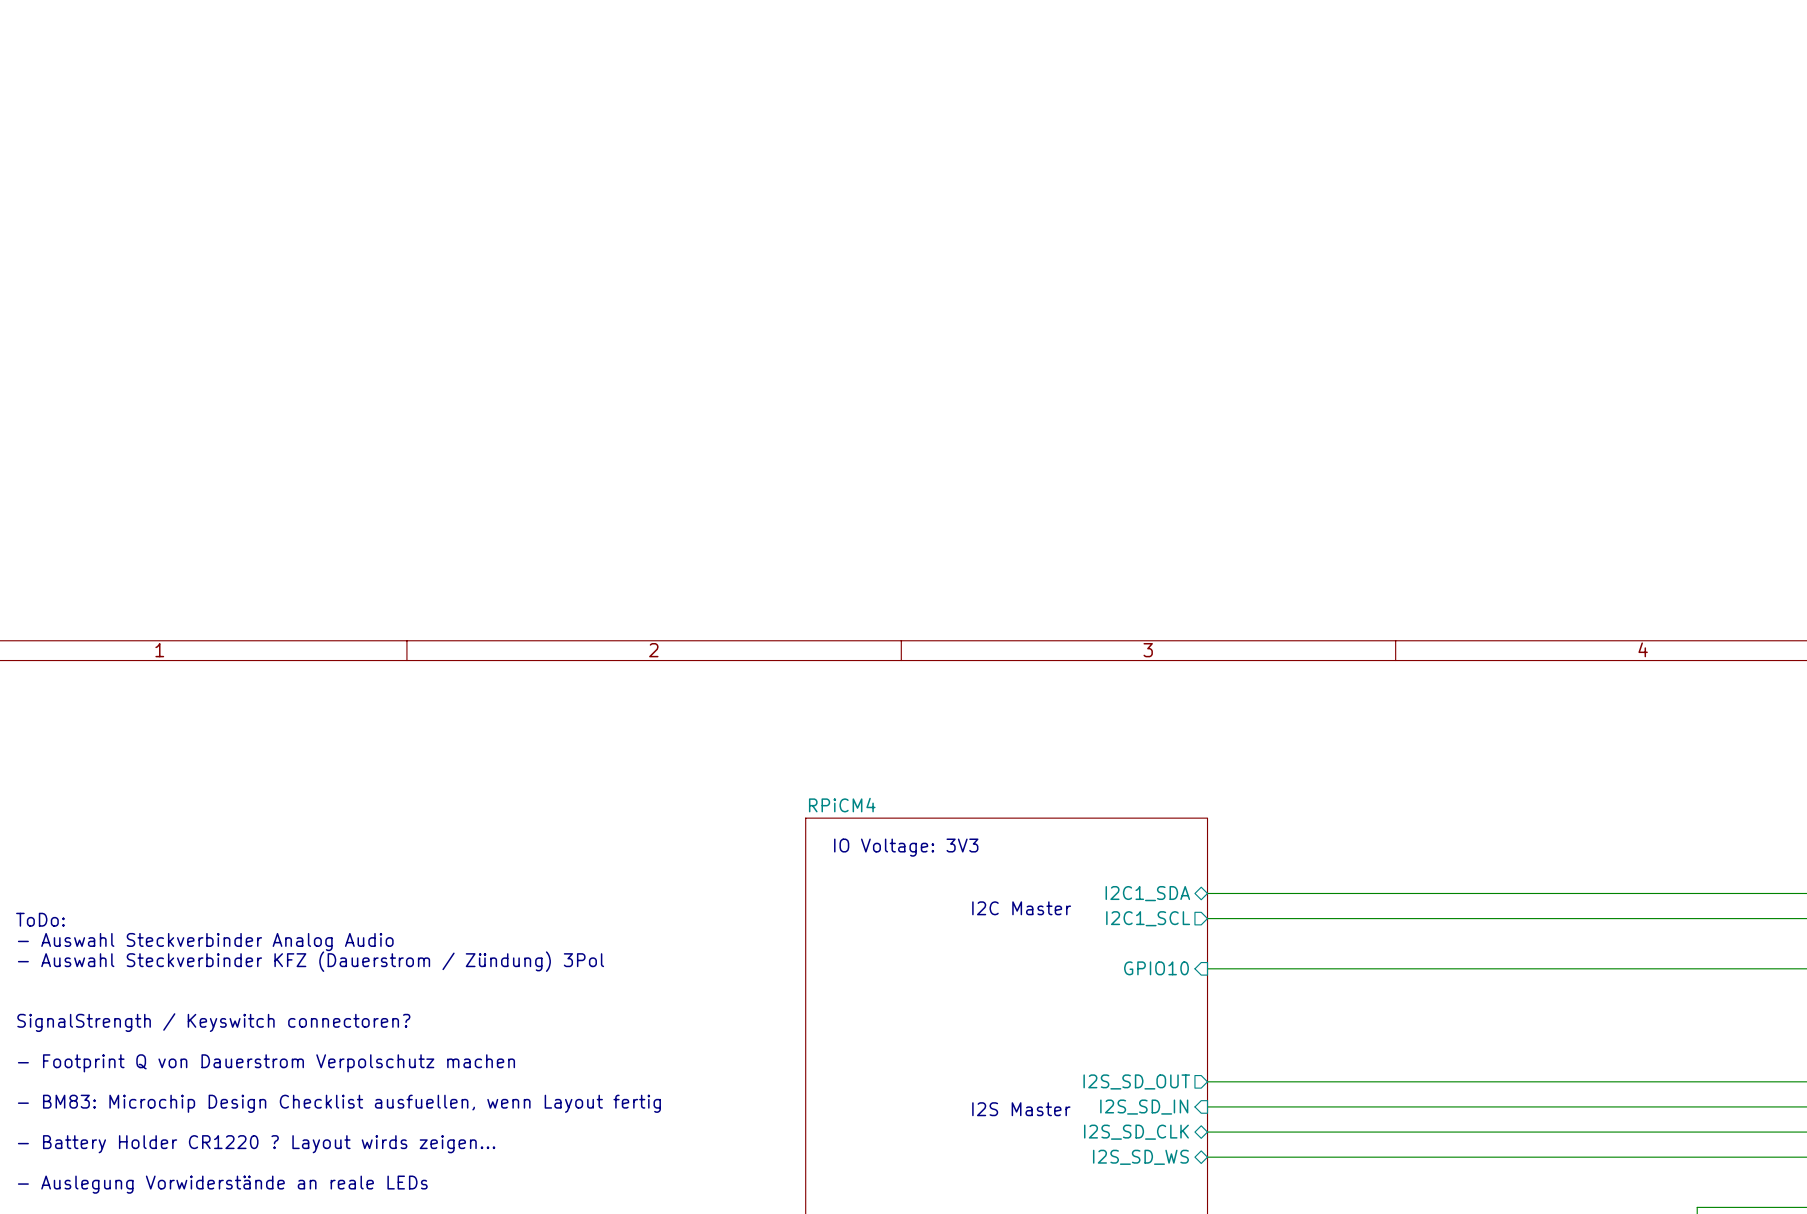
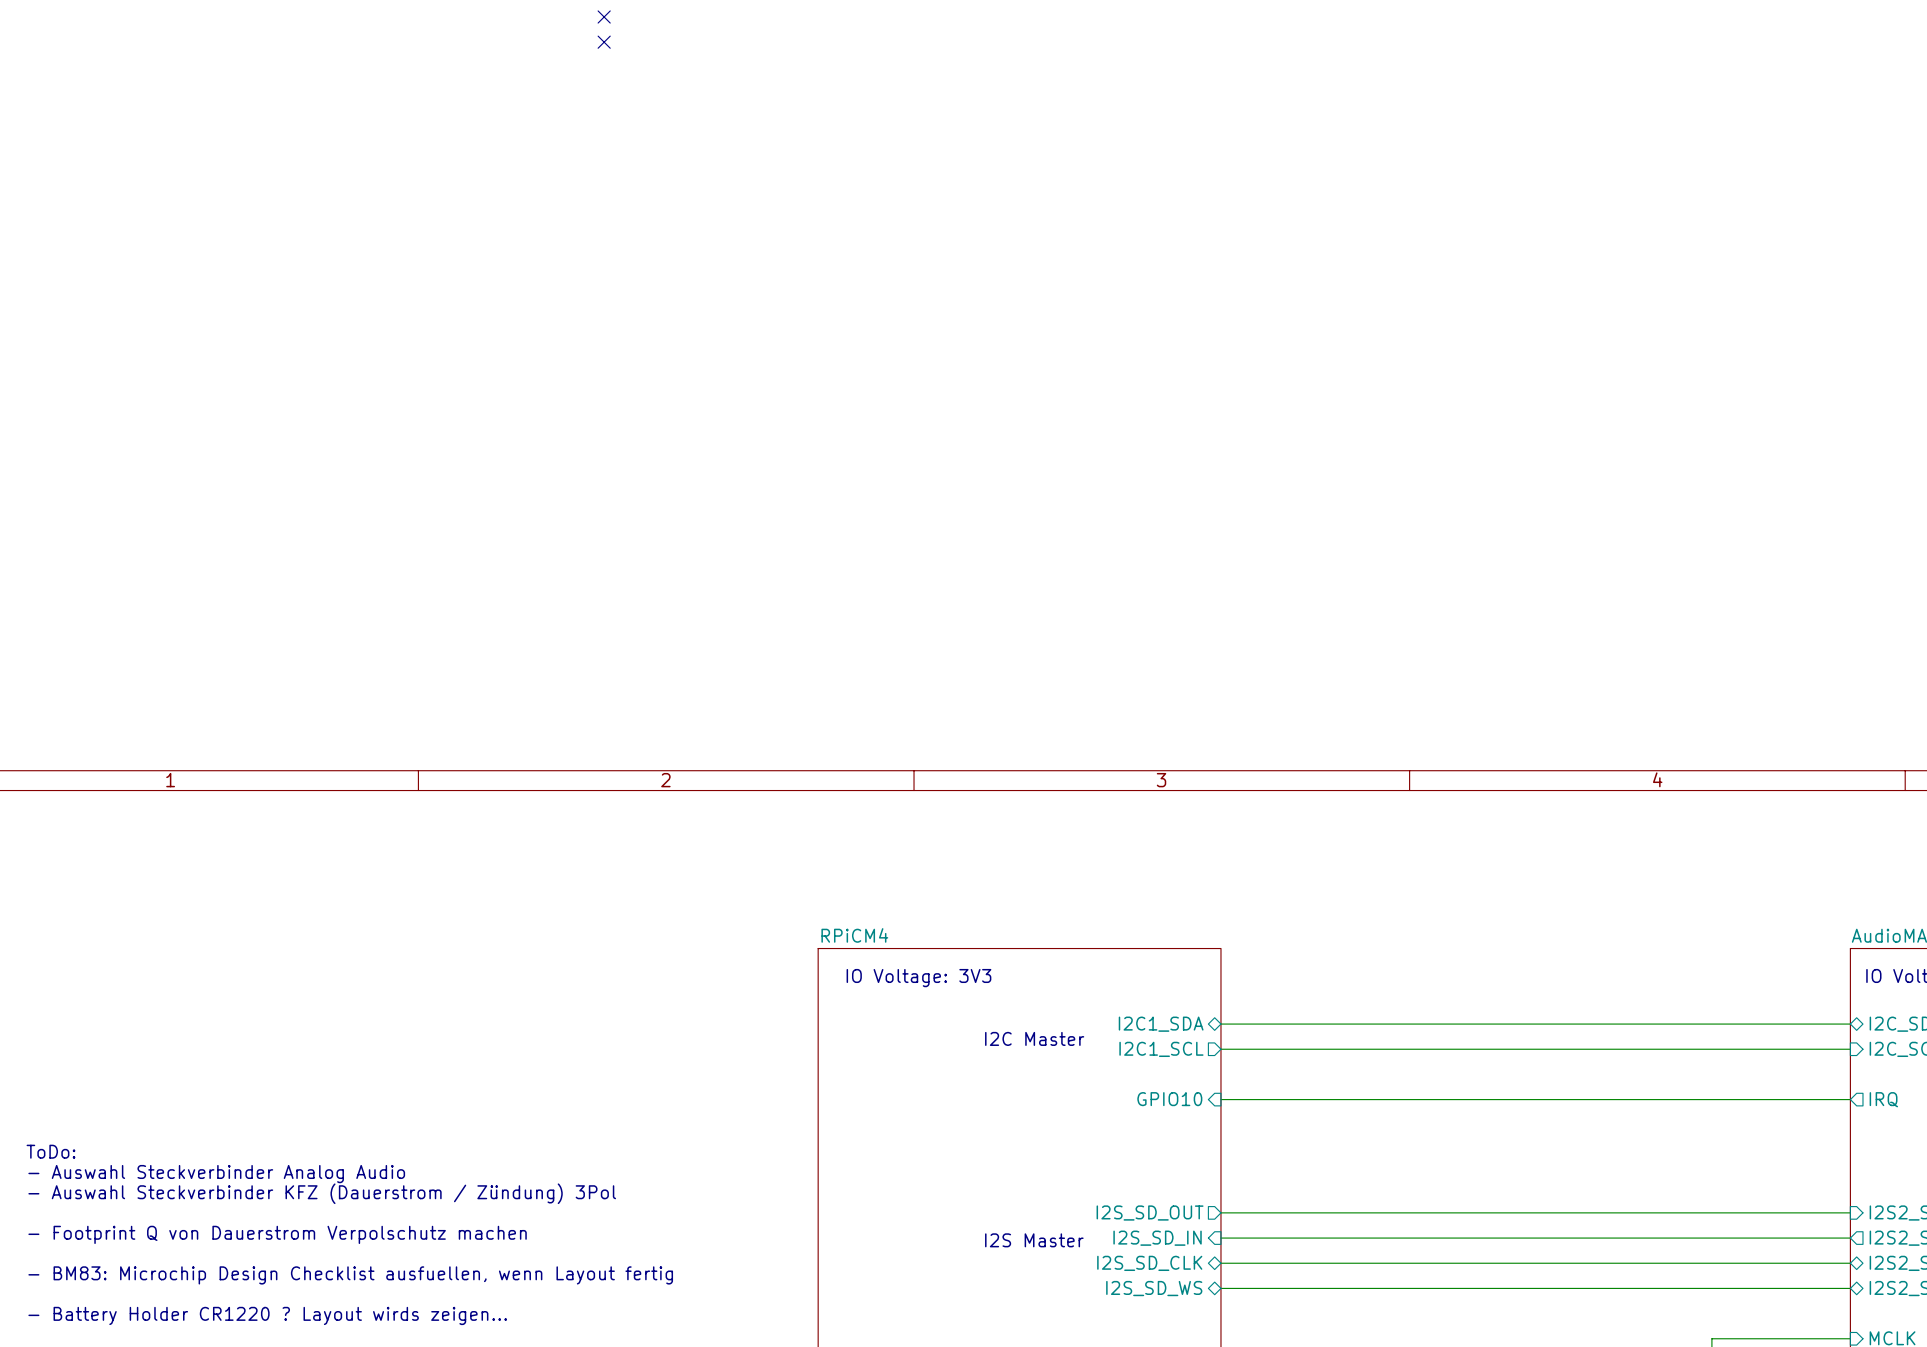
text: ToDo: (40, 919) -> none
text position: - Auswahl Steckverbinder Analog Audio (205, 942) -> - Auswahl Steckverbinder Analog Audio (216, 1174)
text: - Auswahl Steckverbinder KFZ (Dauerstrom / Zündung) 3Pol (311, 961) -> none
text: SignalStrength / Keyswitch connectoren? (213, 1022) -> ToDo: (50, 1151)
text: - Footprint Q von Dauerstrom Verpolschutz machen (266, 1063) -> - Auswahl Steckverbinder KFZ (Dauerstrom / Zündung) 3Pol (322, 1193)
text: - BM83: Microchip Design Checklist ausfuellen, wenn Layout fertig (339, 1103) -> - Footprint Q von Dauerstrom Verpolschutz machen (277, 1234)
text: - Battery Holder CR1220 ? Layout wirds zeigen… (256, 1144) -> - BM83: Microchip Design Checklist ausfuellen, wenn Layout fertig (350, 1275)
text: - Auslegung Vorwiderstände an reale LEDs (222, 1184) -> - Battery Holder CR1220 ? Layout wirds zeigen… (267, 1315)

